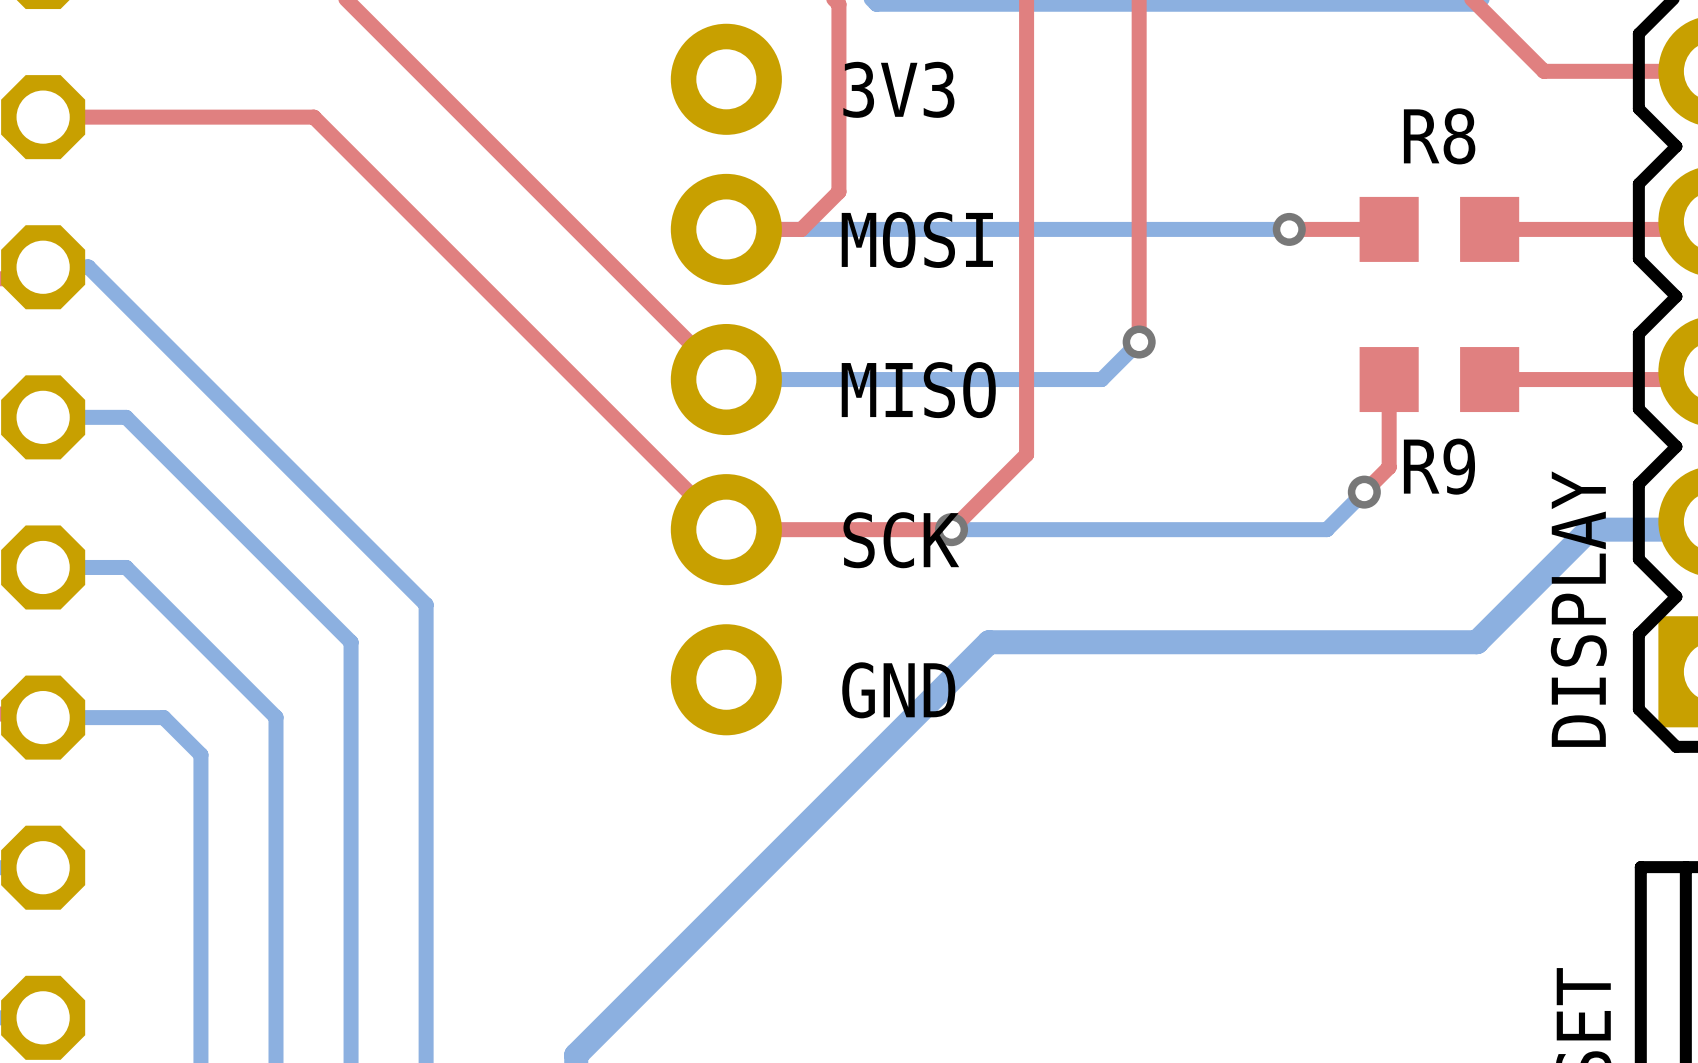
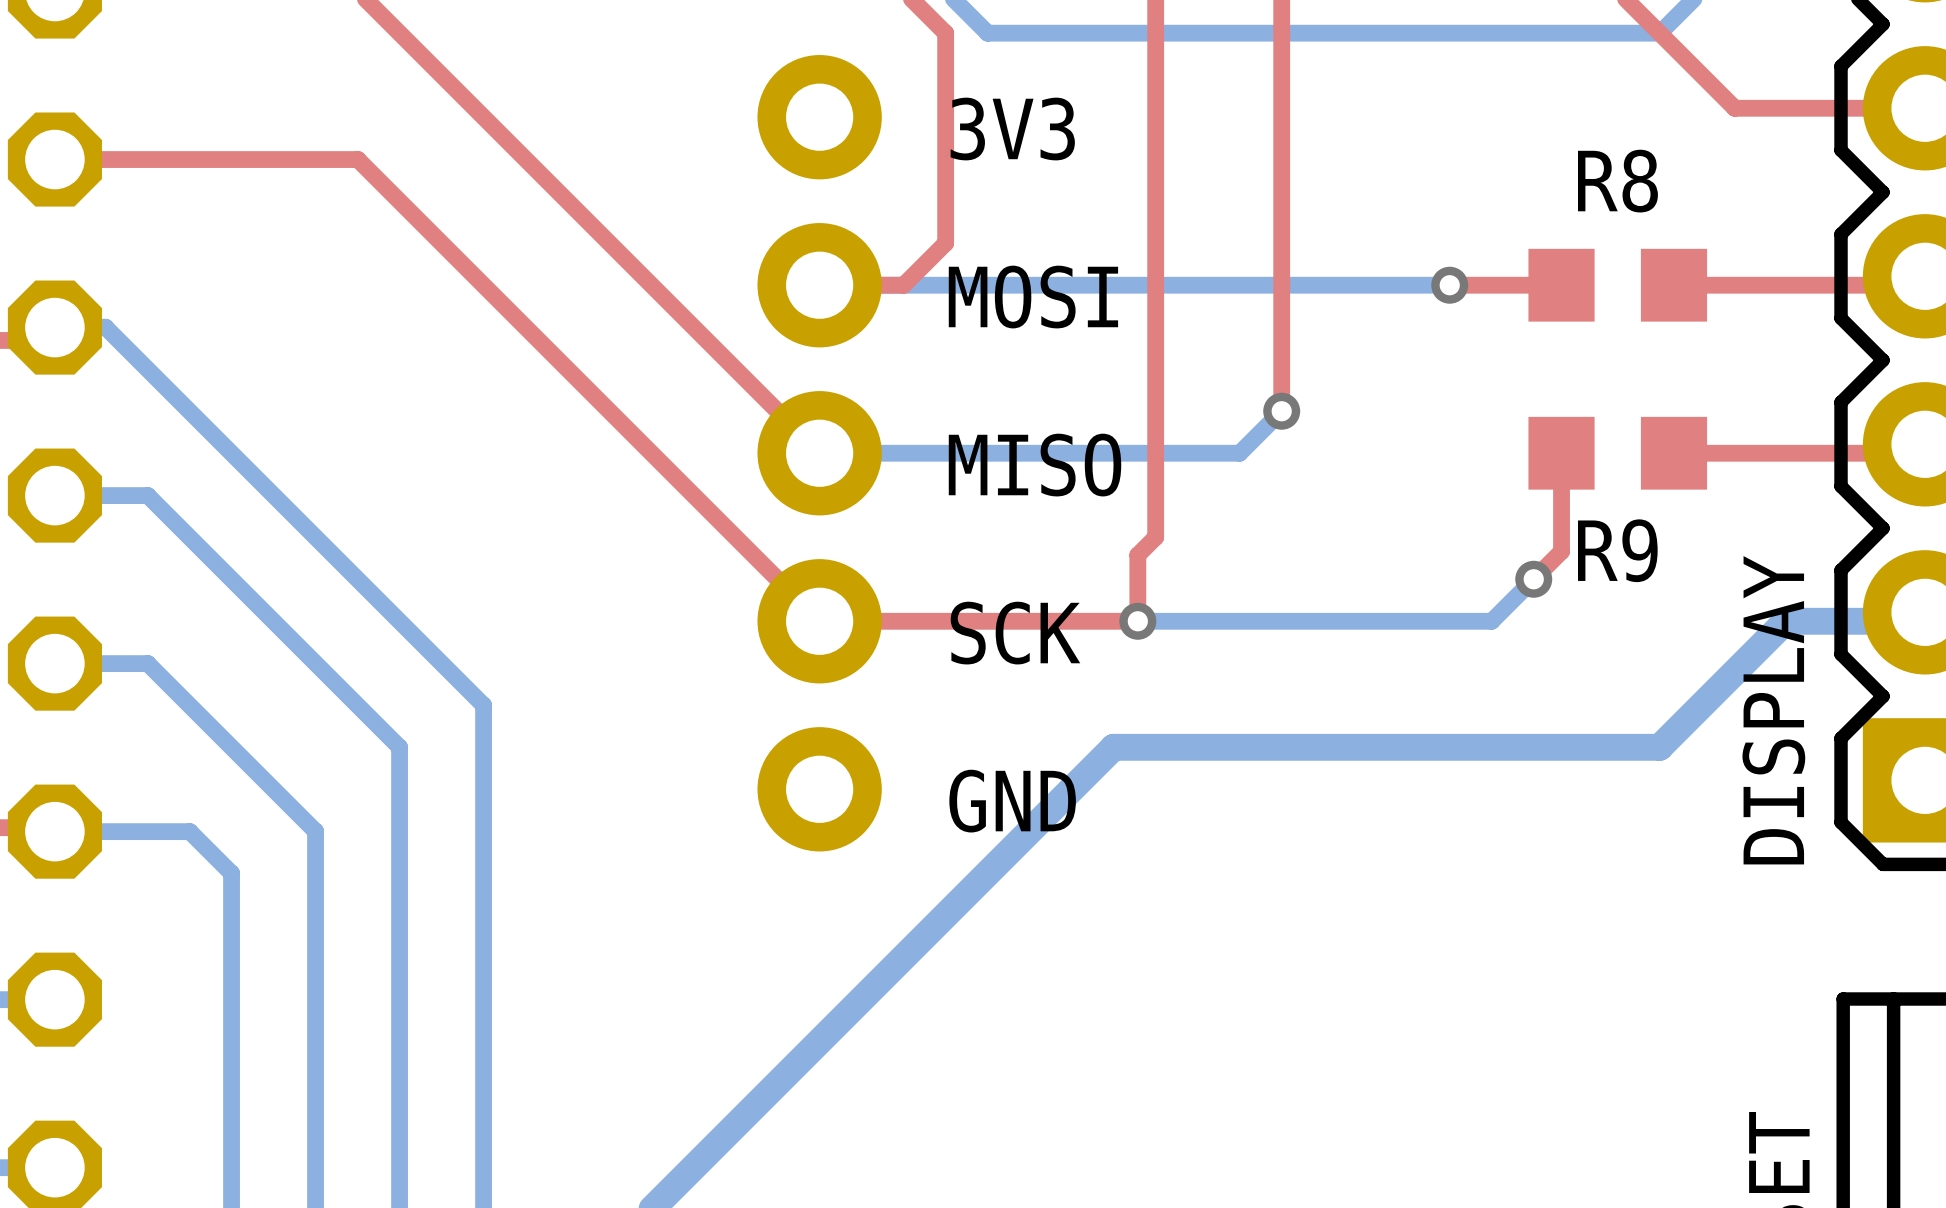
top track: (1010, 470) (951, 529) -> (1137, 555) (1137, 621) (1071, 621)
bottom track: (951, 529) (1010, 529) -> none
via position: (951, 529) -> (1137, 621)

